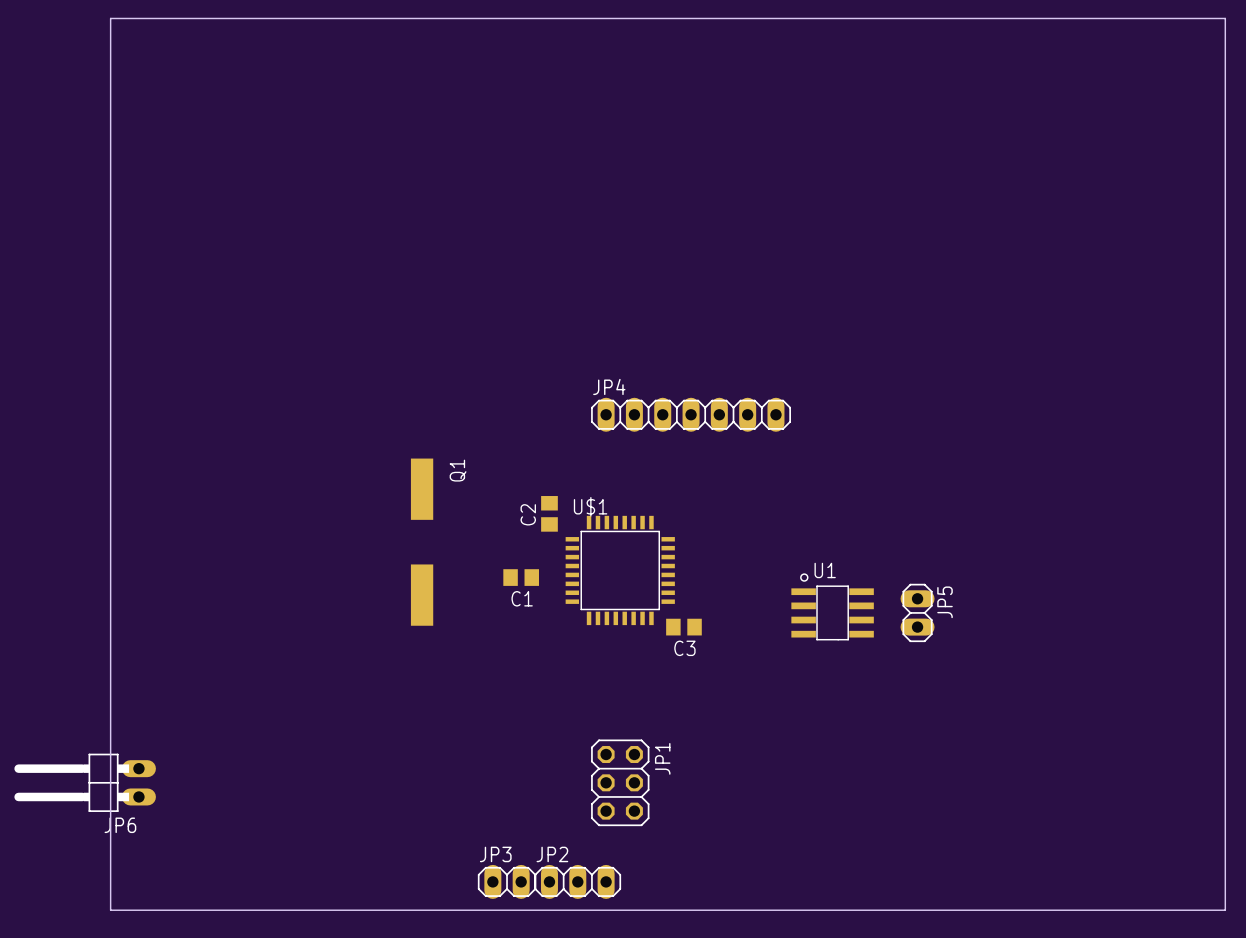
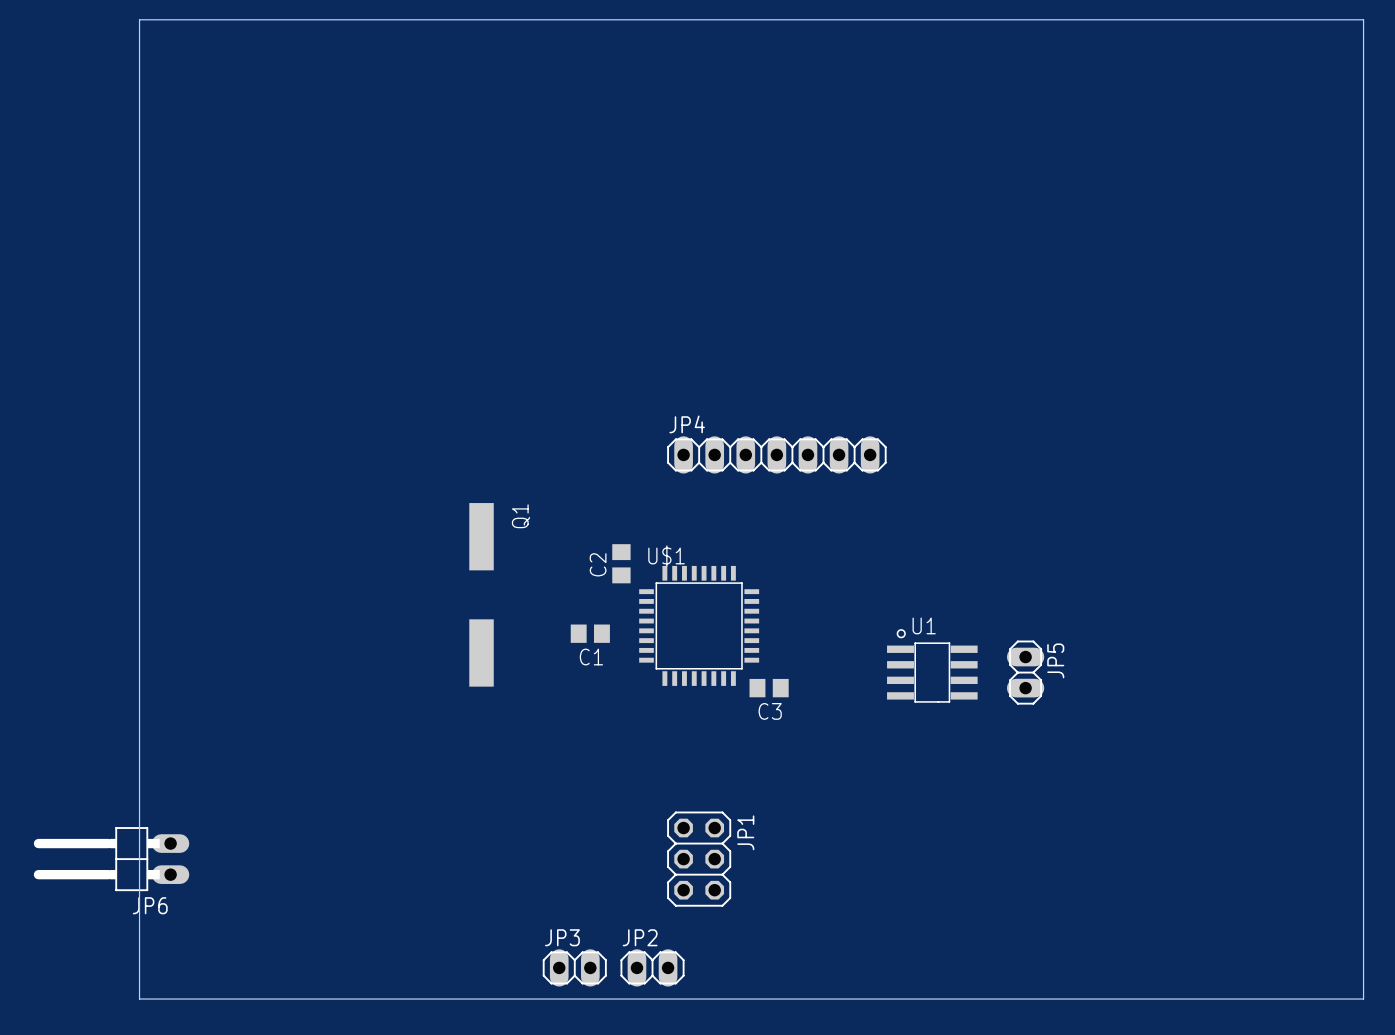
JP2 footprint: [534, 864, 622, 899] -> [620, 949, 685, 987]

